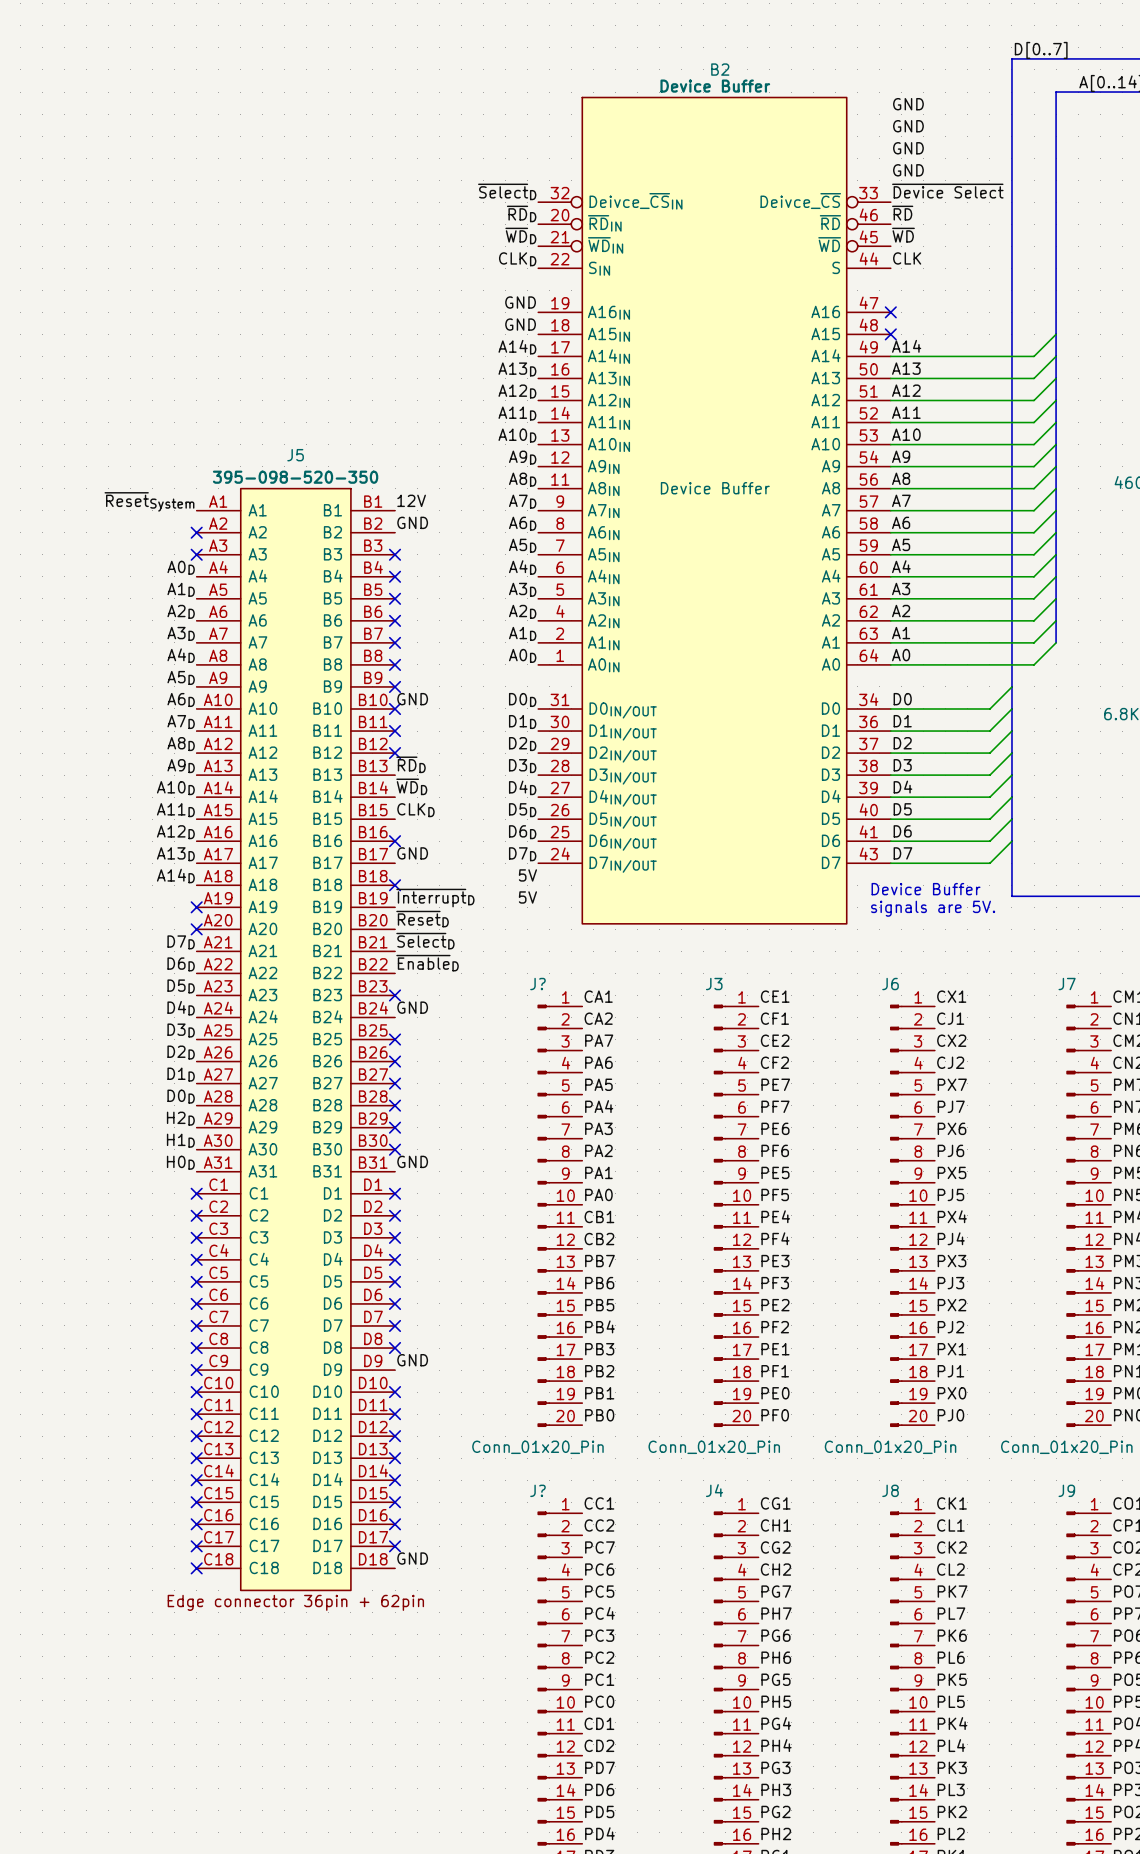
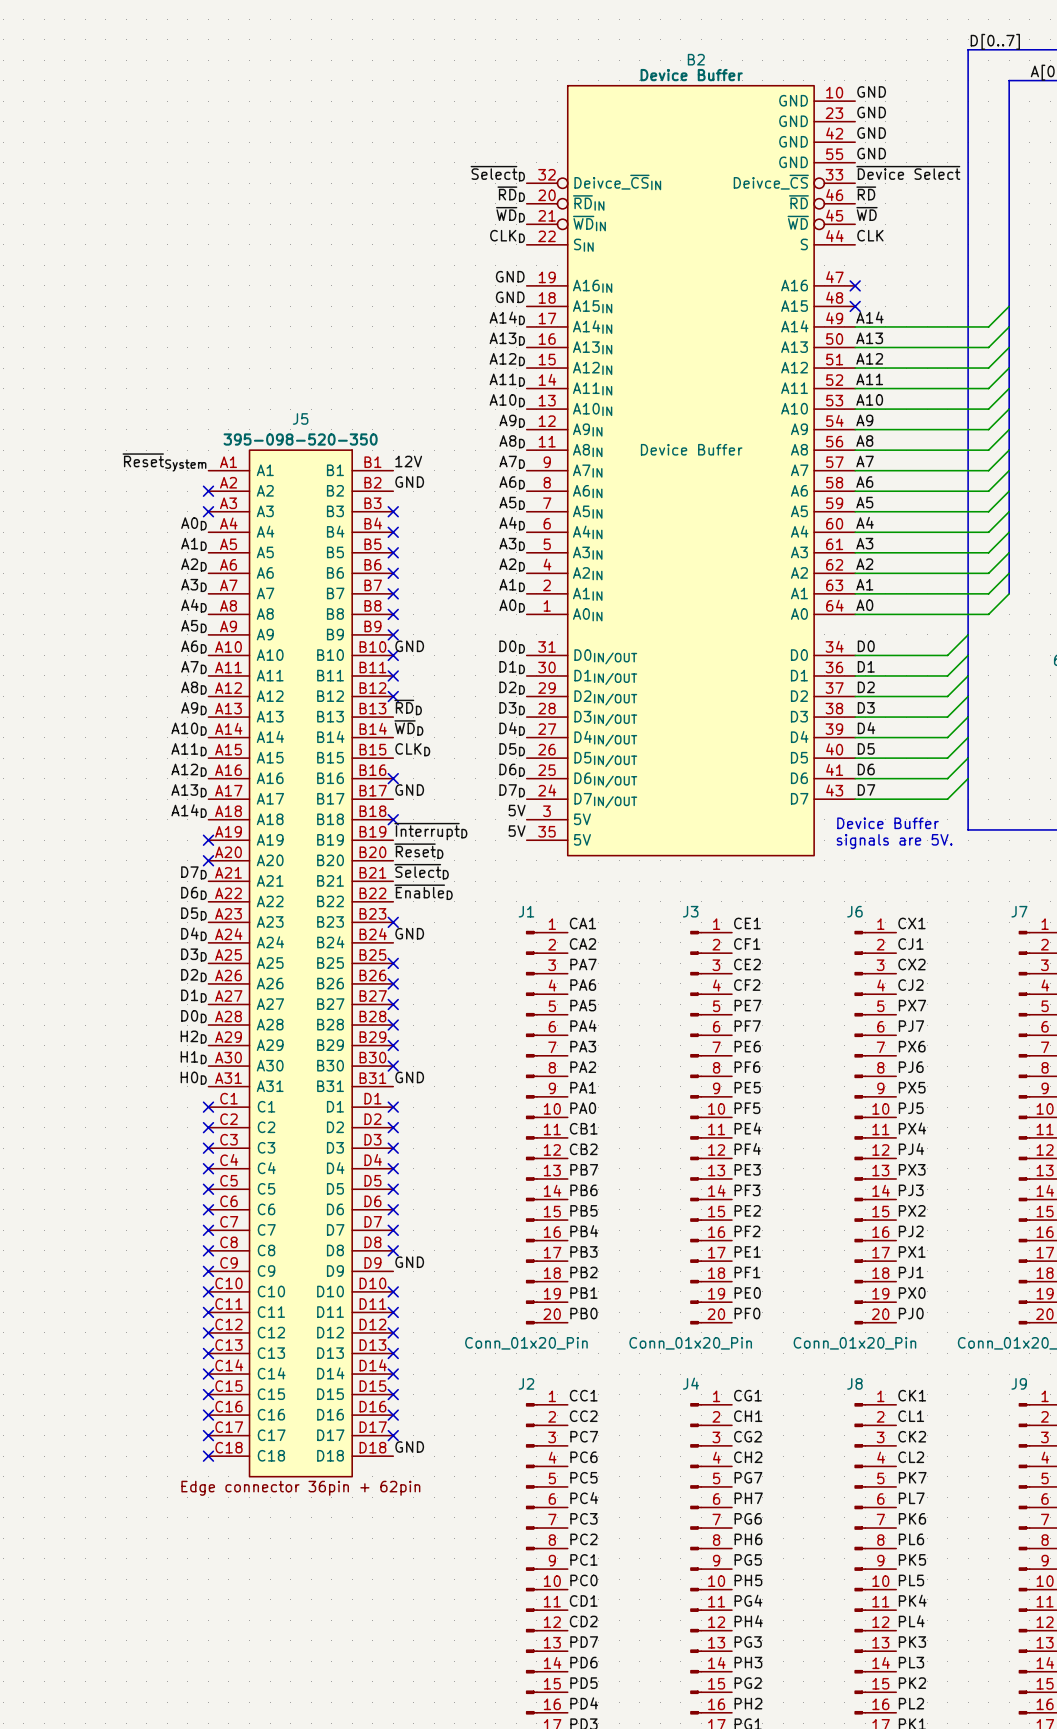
B2 symbol: [538, 96, 891, 925] -> [526, 85, 856, 857]
J? name: J? (537, 984) -> J1 (526, 911)
J? name: J? (537, 1490) -> J2 (526, 1383)

